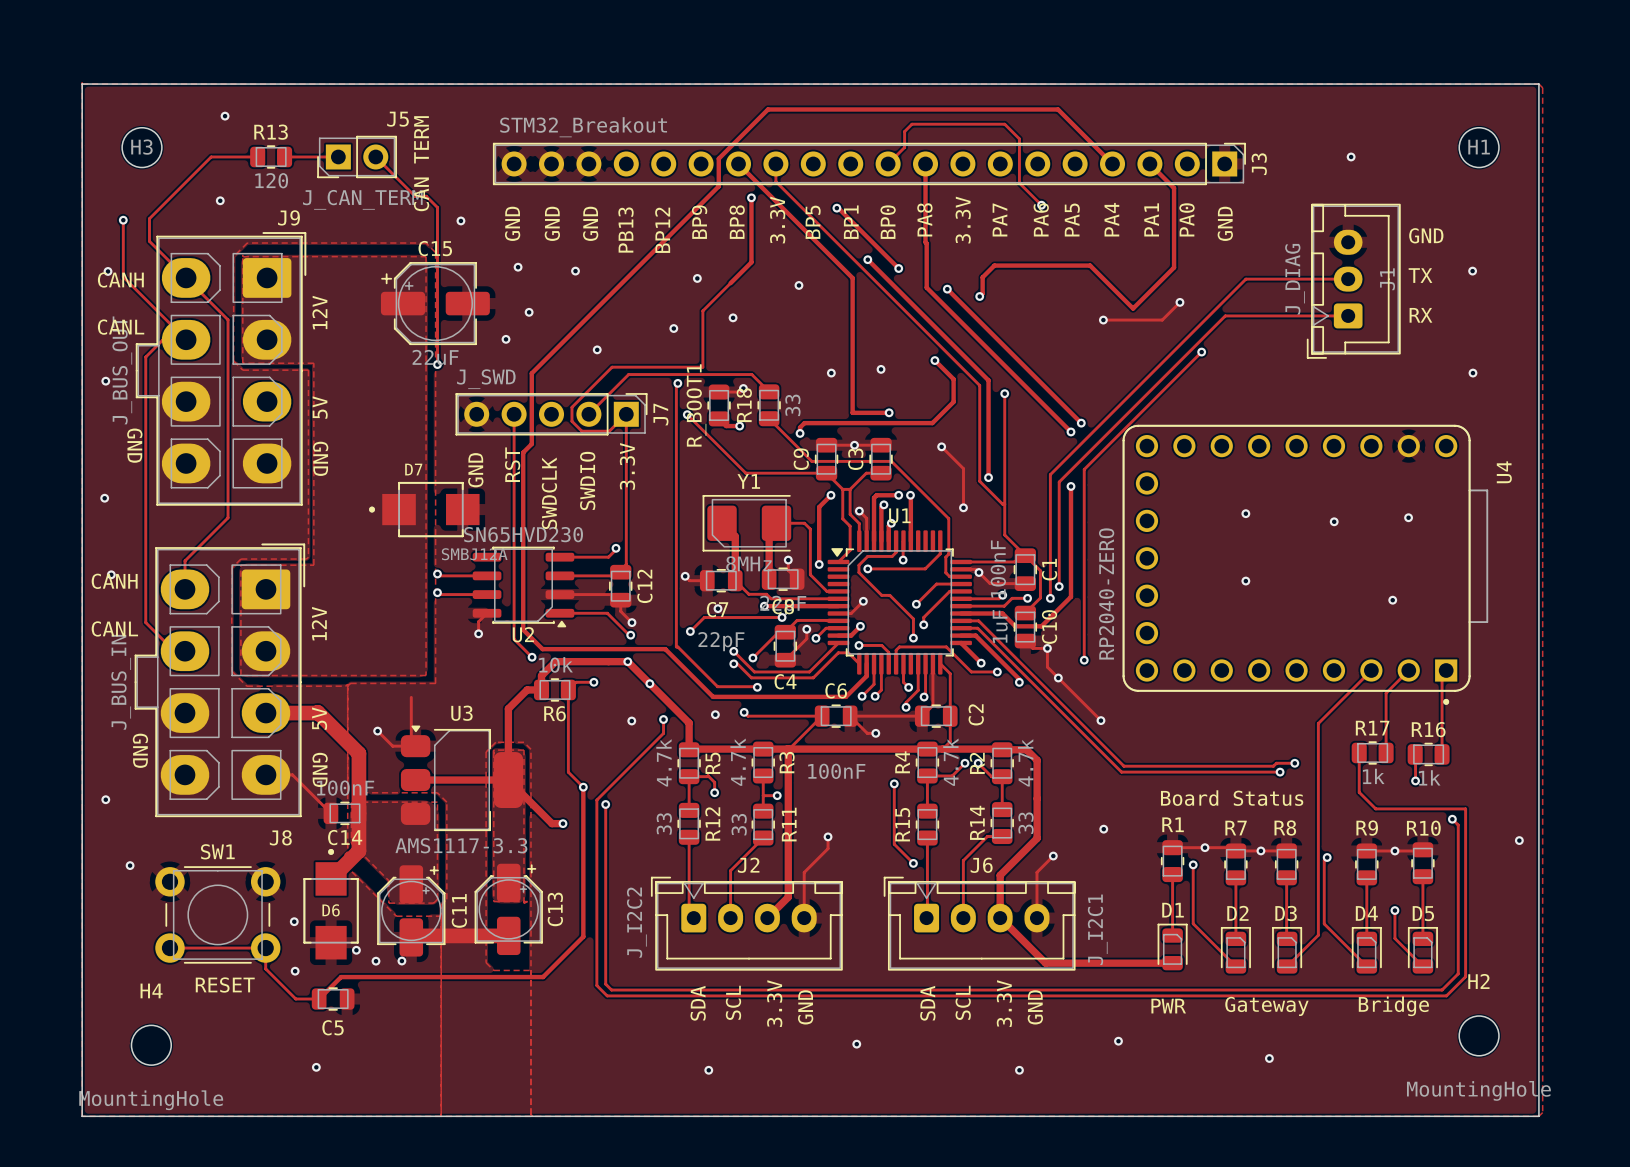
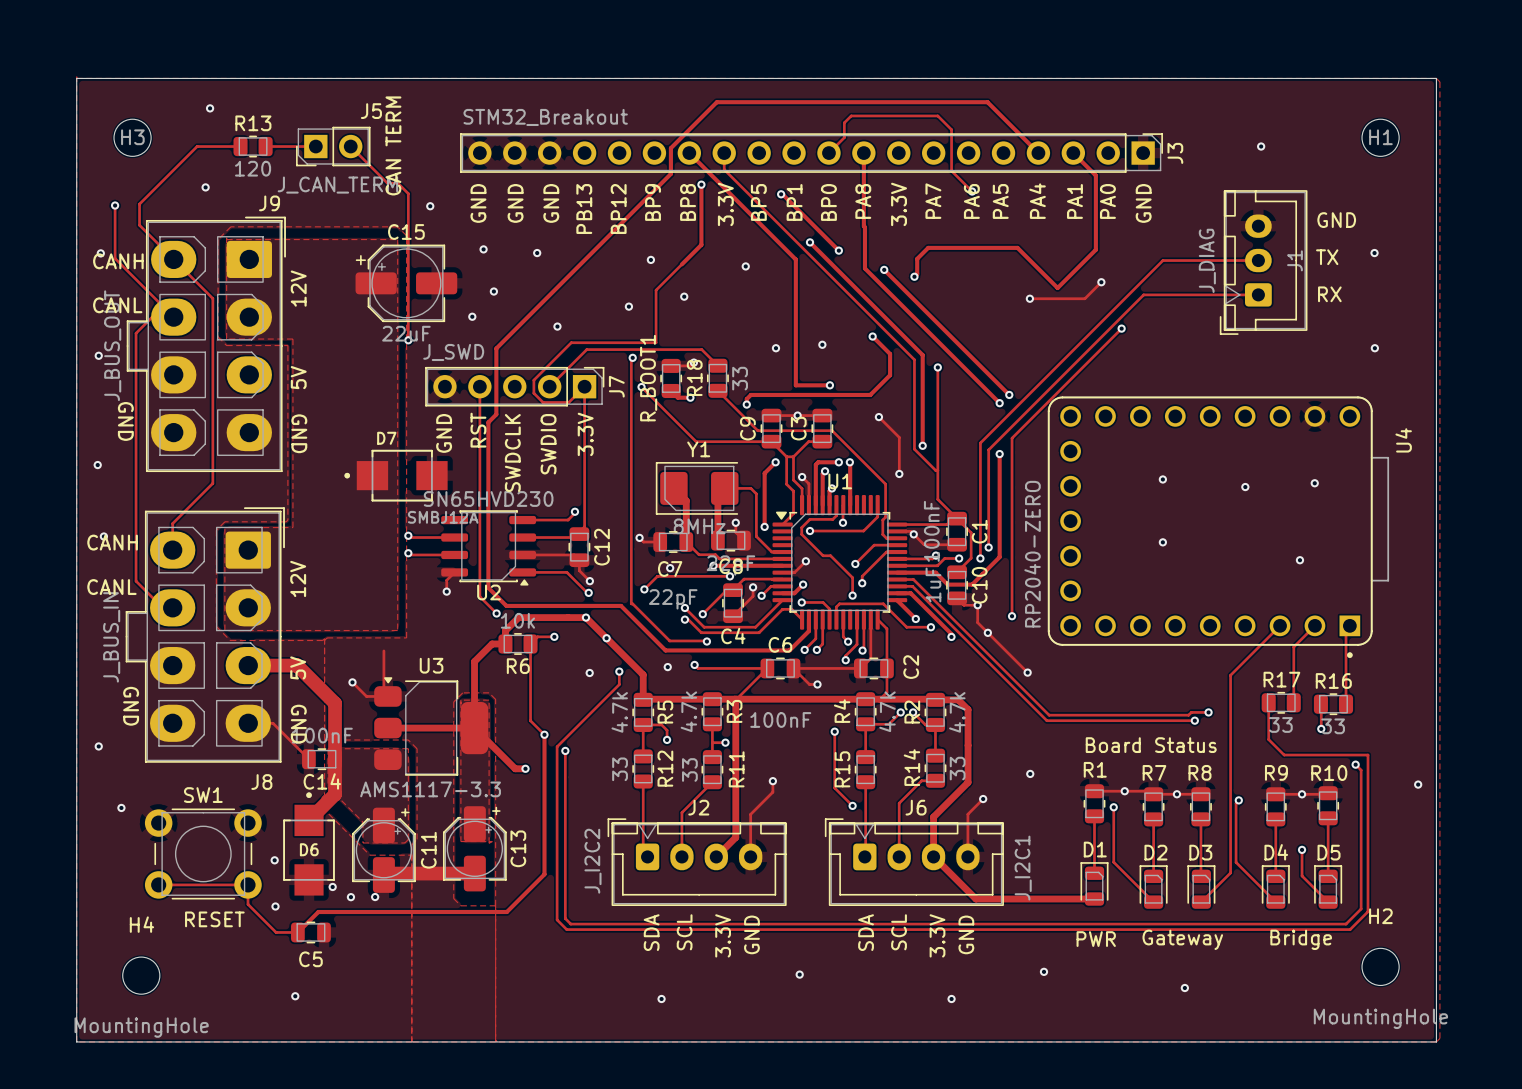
R17 value: 1k (1373, 776) -> 33 (1280, 724)
R16 value: 1k (1429, 777) -> 33 (1333, 726)

